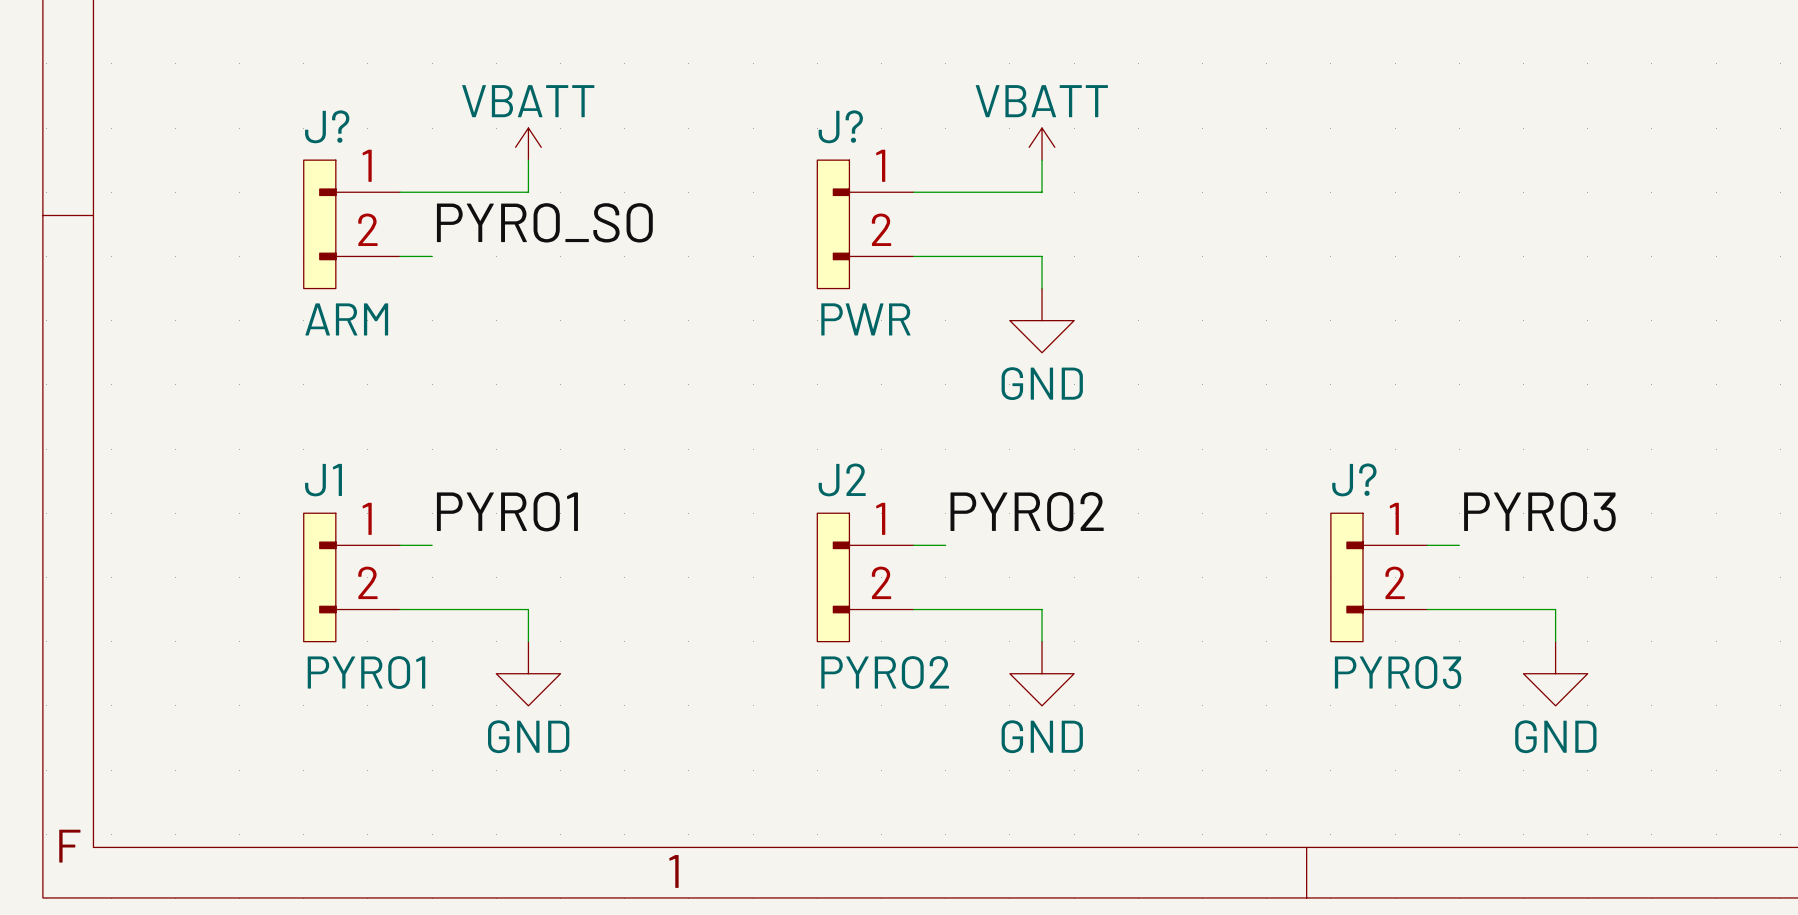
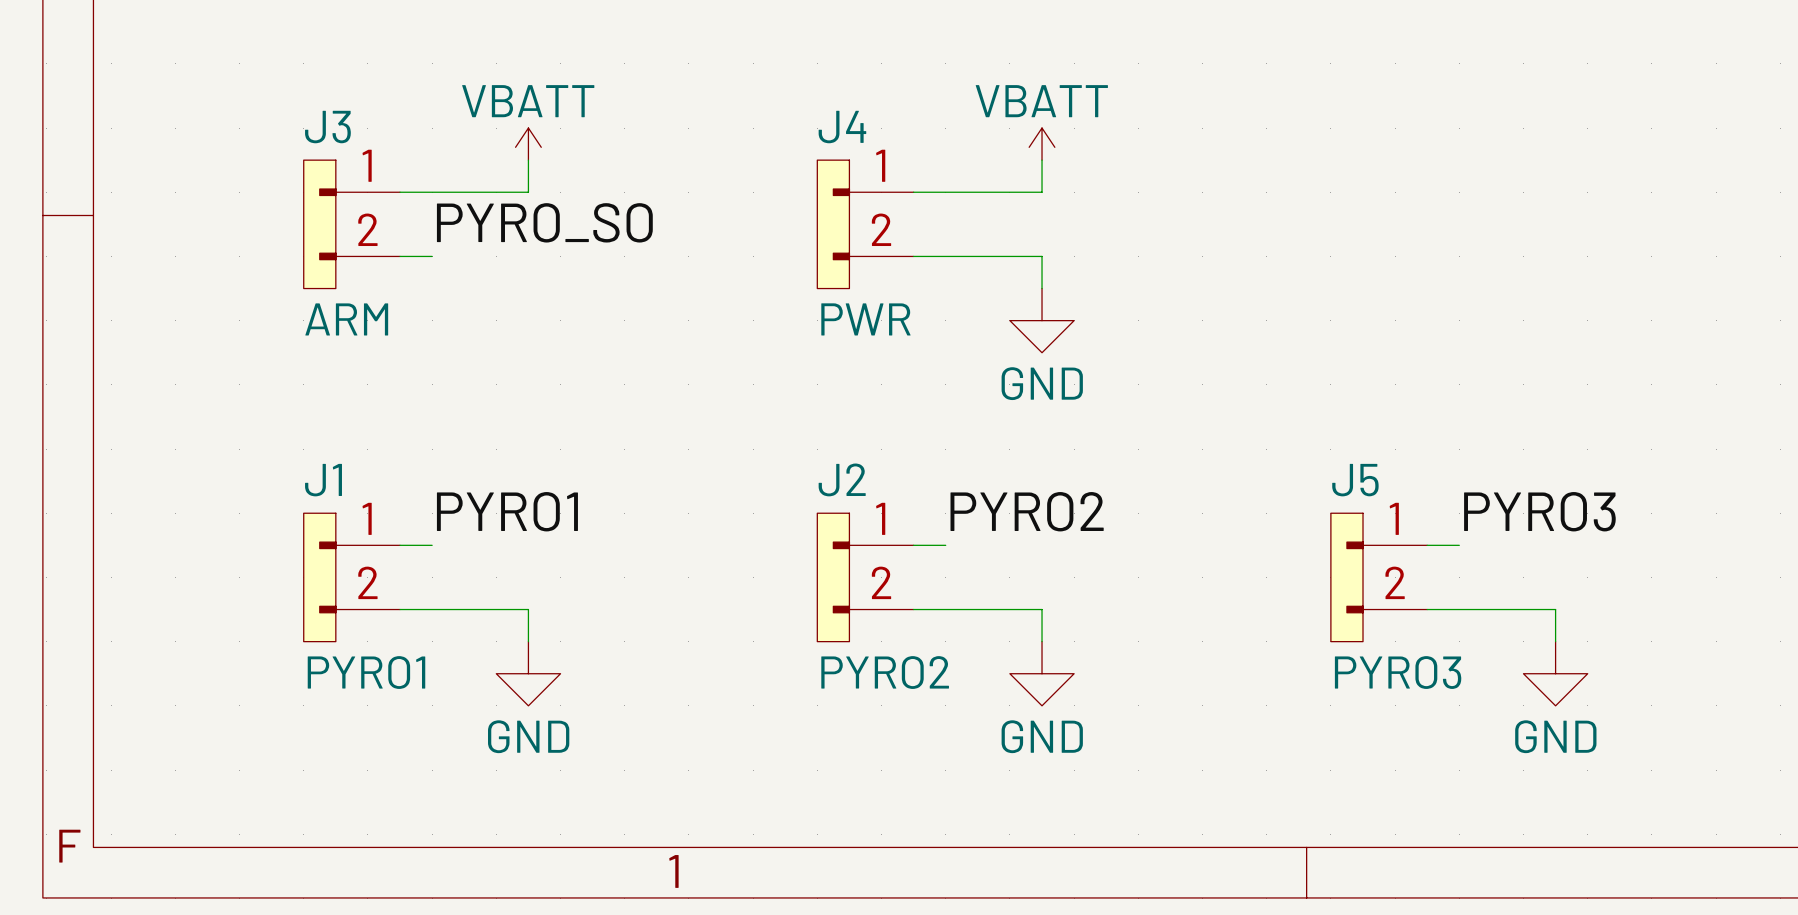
J? name: J? (327, 126) -> J3 (327, 127)
J? name: J? (840, 126) -> J4 (842, 127)
J? name: J? (1354, 479) -> J5 (1355, 480)

